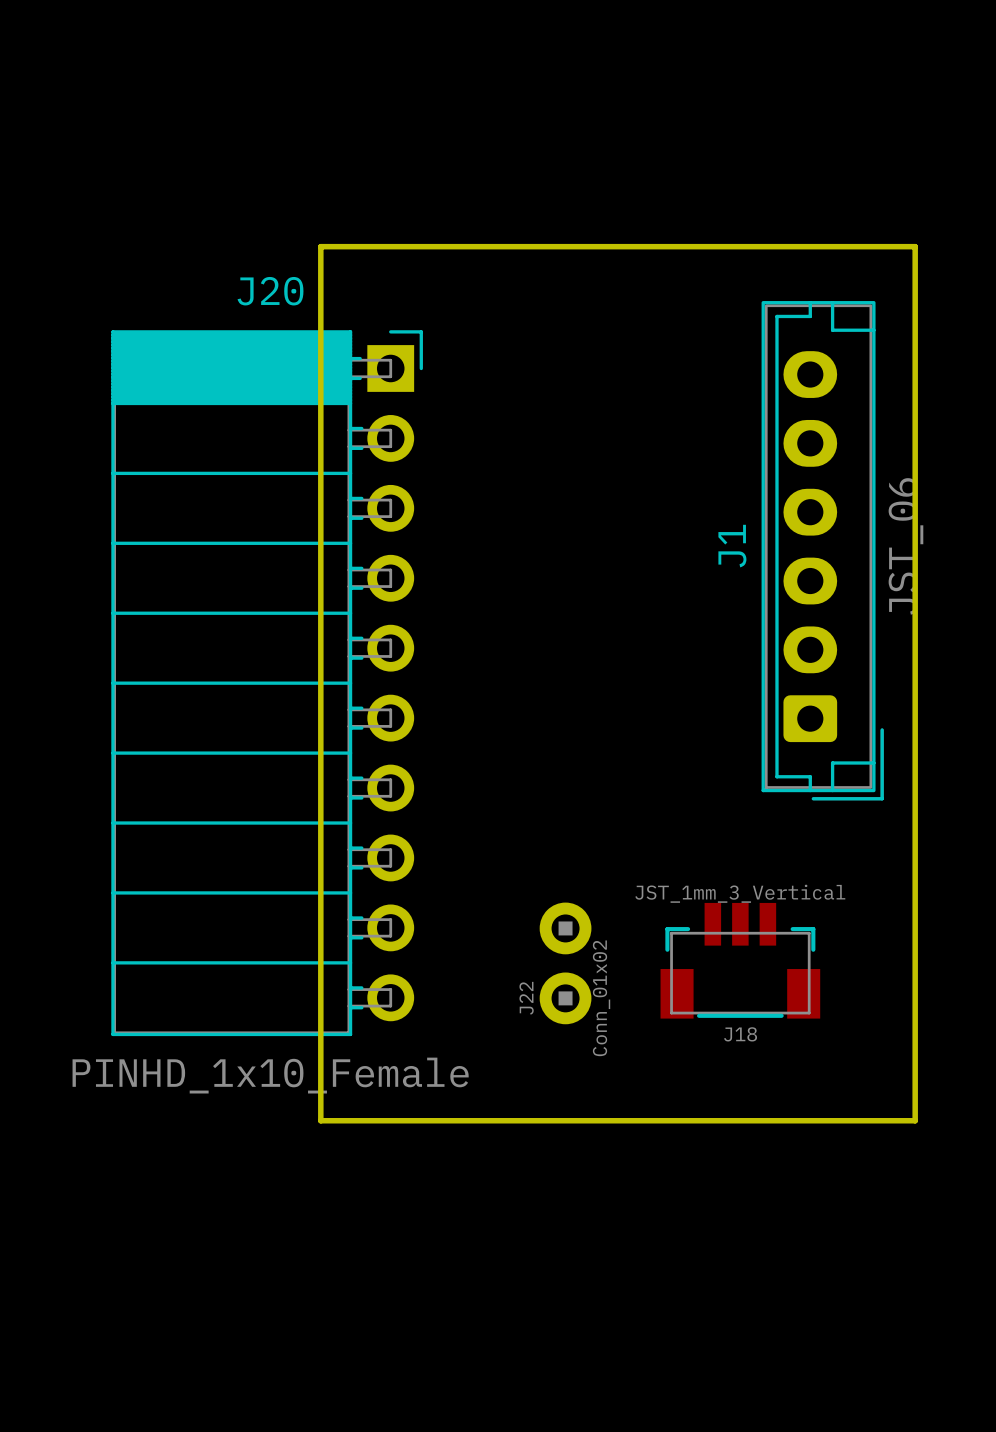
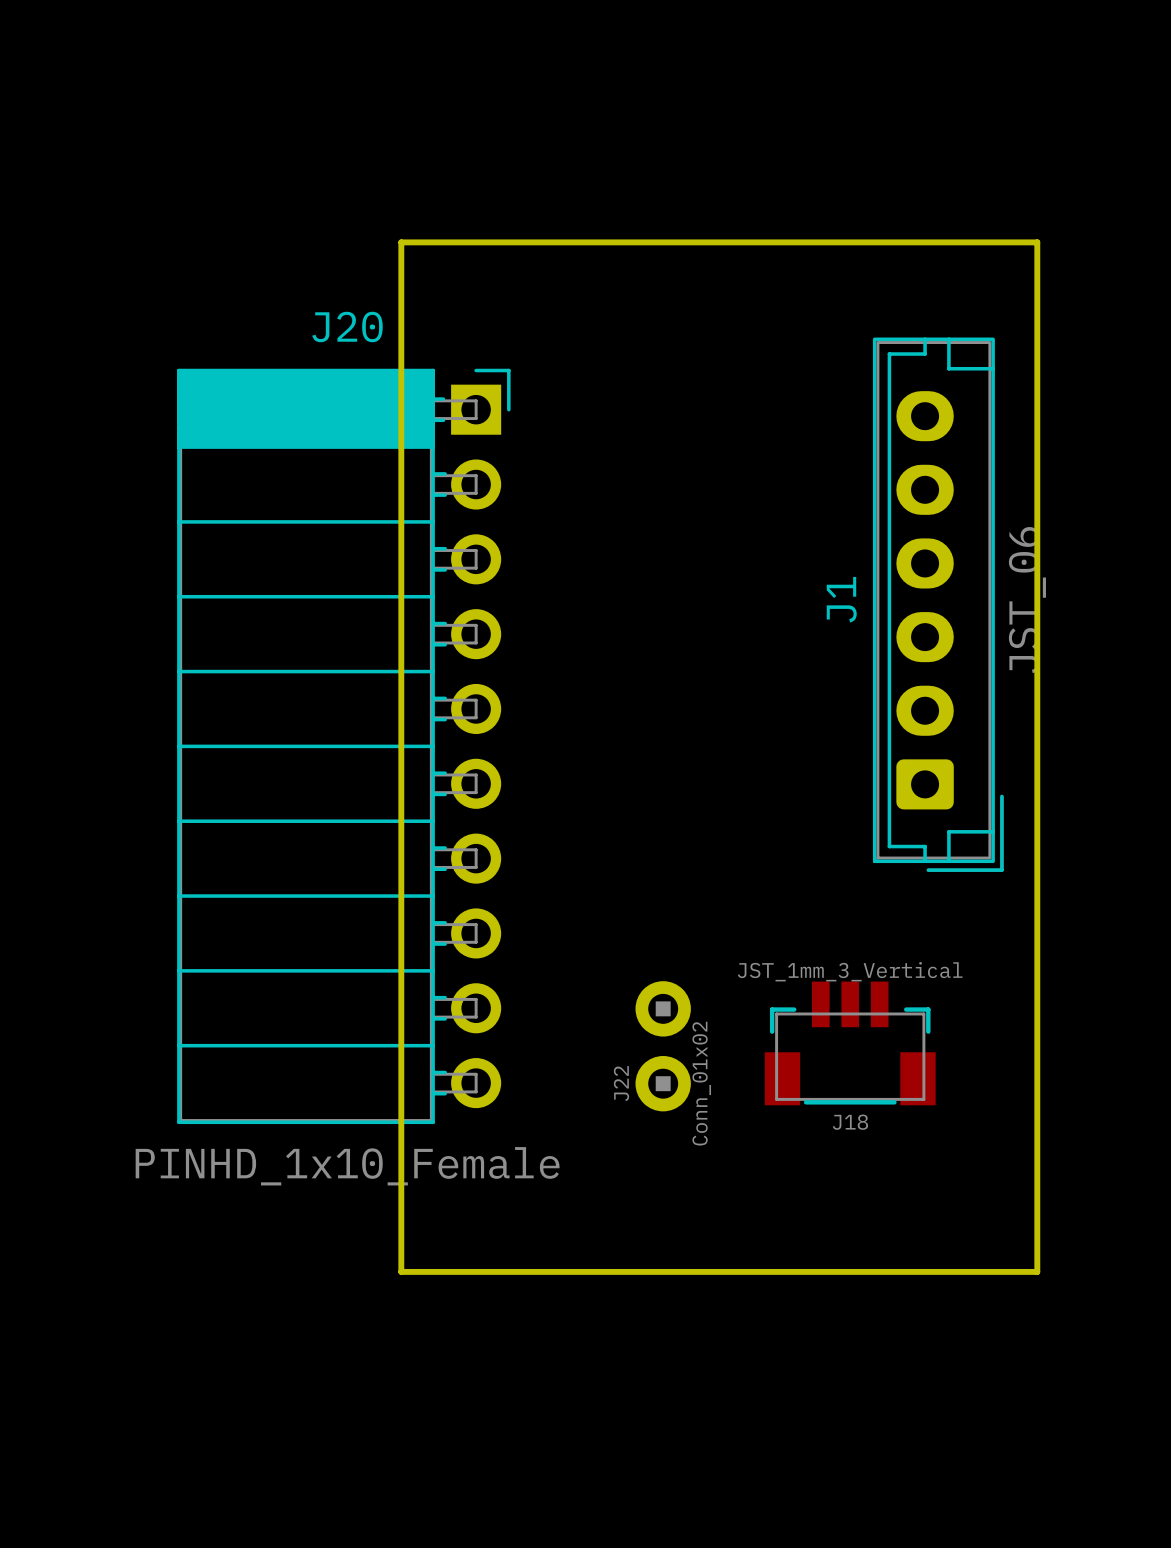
board edge: (320, 246) (915, 246) -> (401, 279) (401, 242) (1037, 242) (1037, 279)
board edge: (320, 1120) (915, 1120) -> (401, 1214) (401, 1271) (1037, 1271) (1037, 1214)

